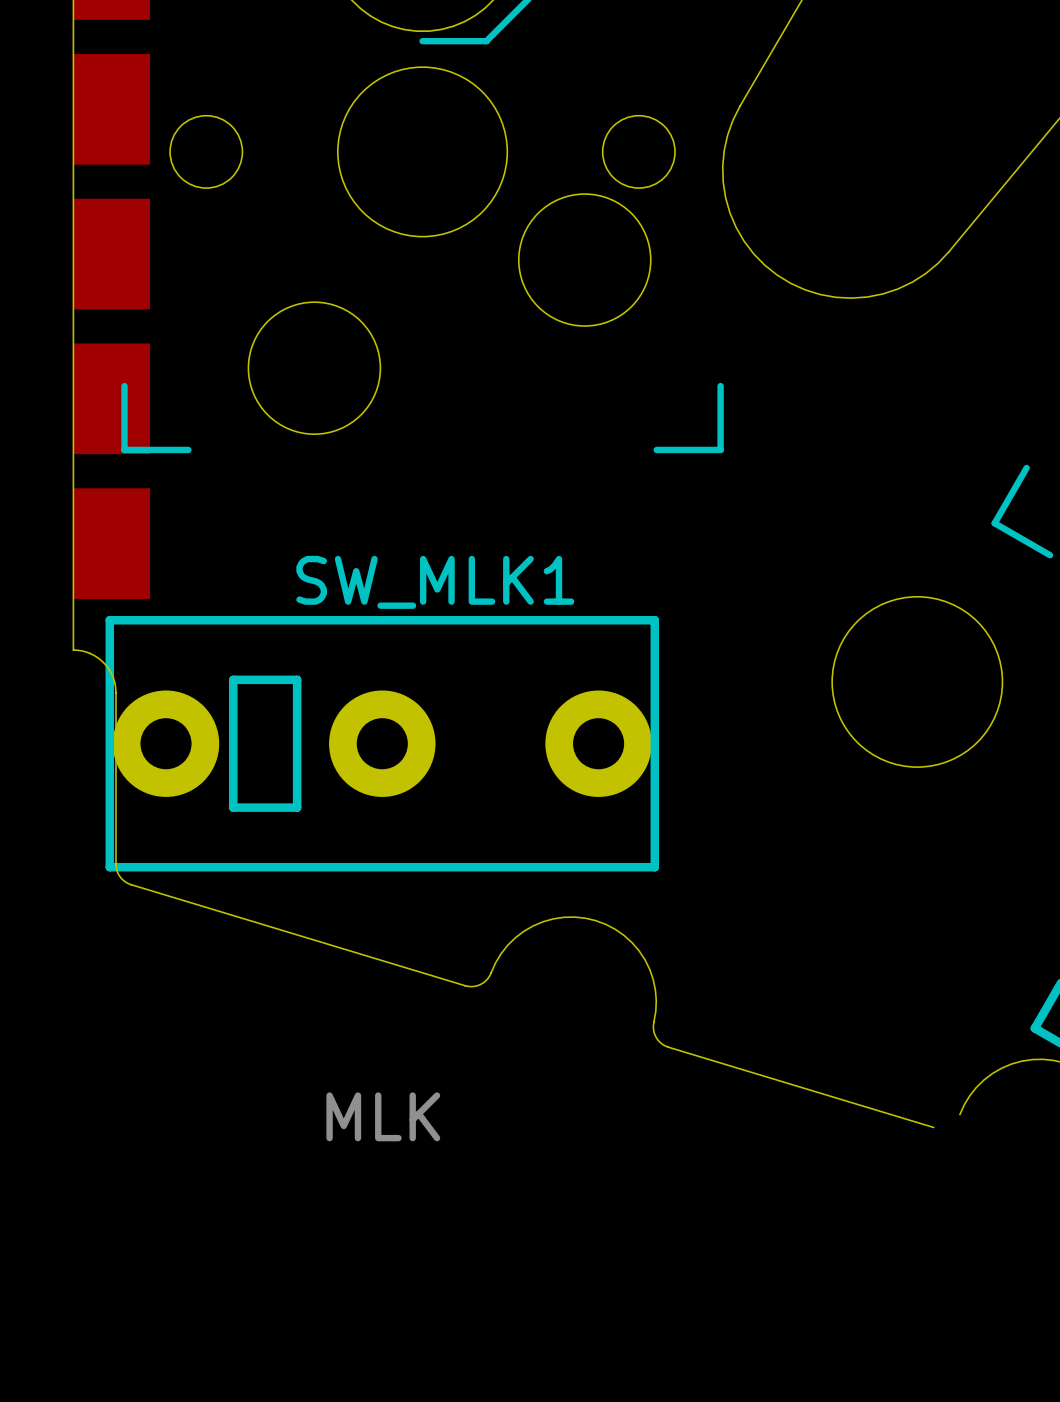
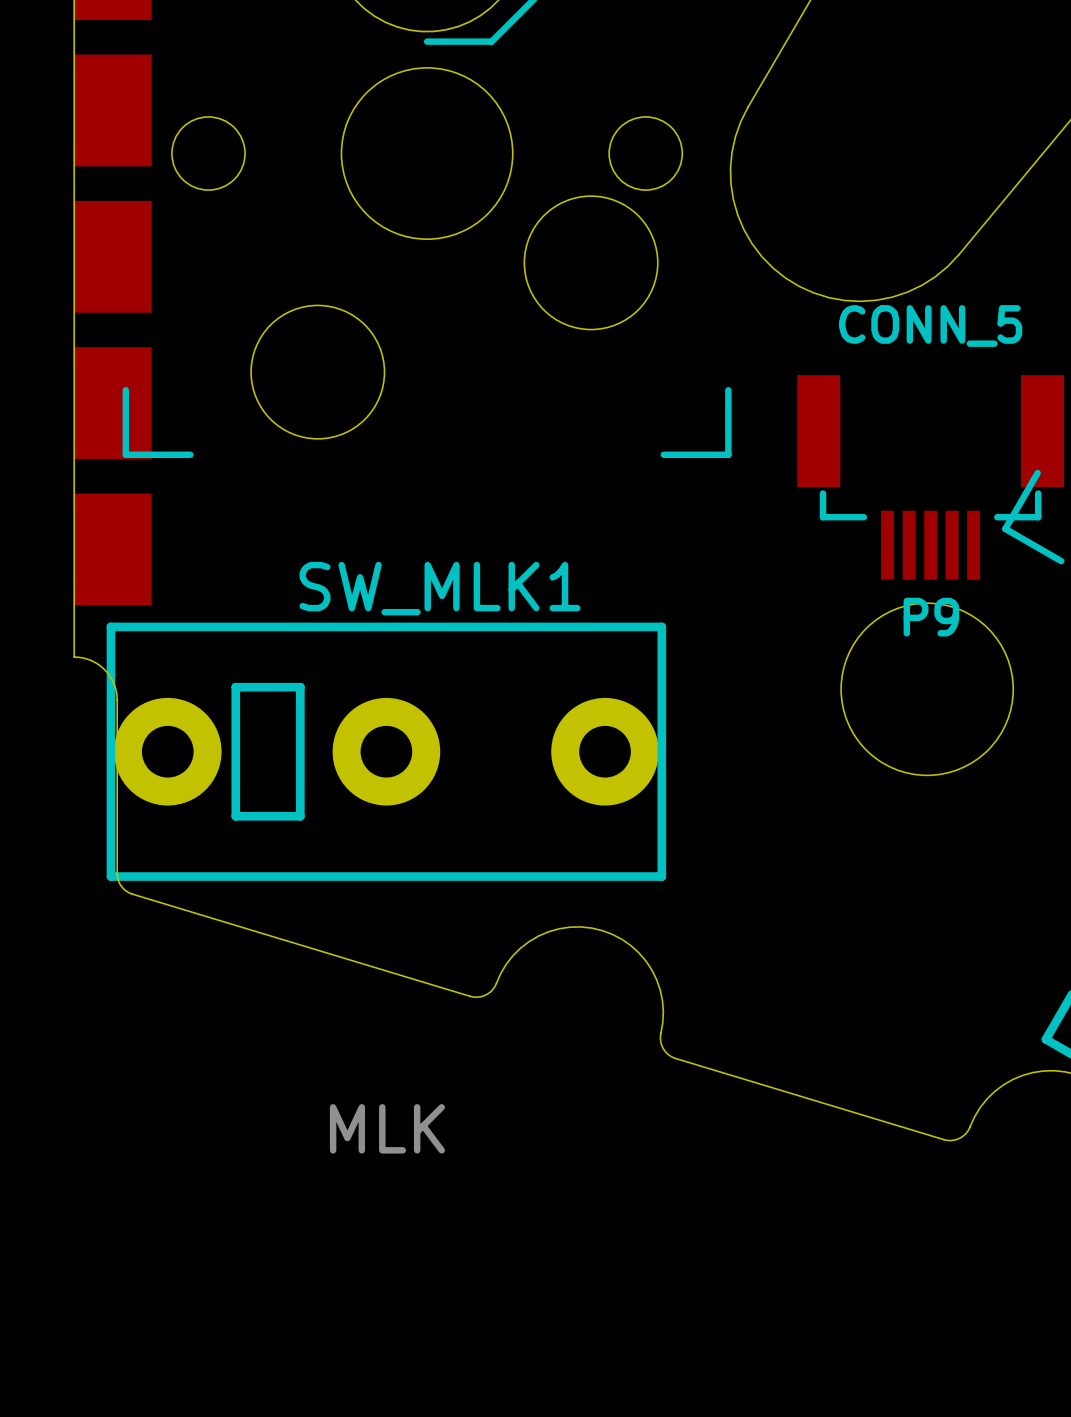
P9: none -> CONN_5 (930, 477)
board edge: none -> (970, 1126) (966, 1133) (959, 1138) (951, 1140) (943, 1139)

